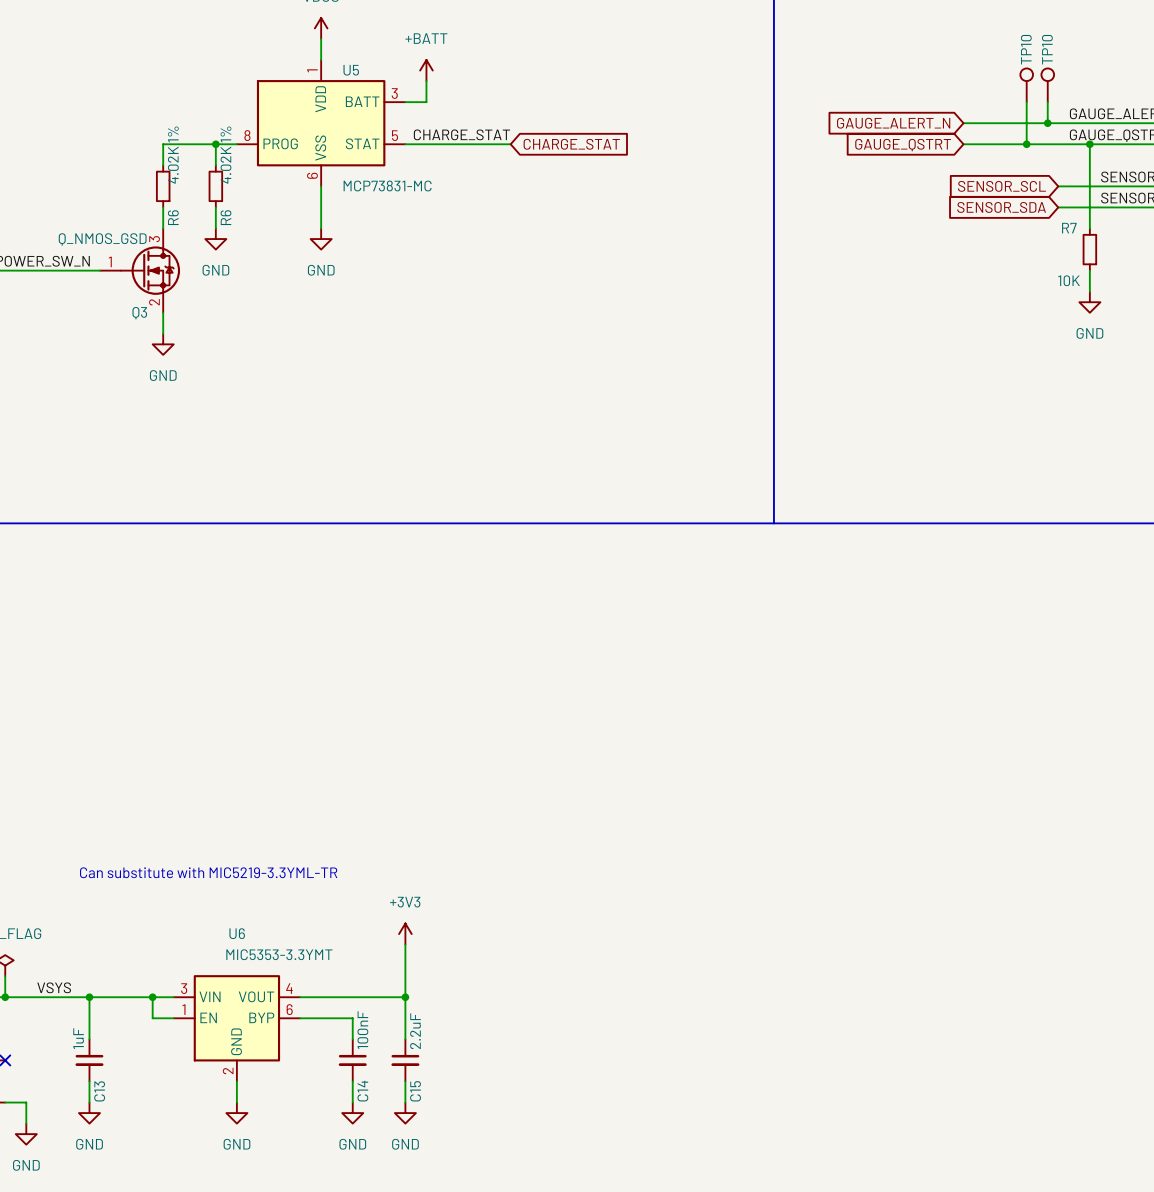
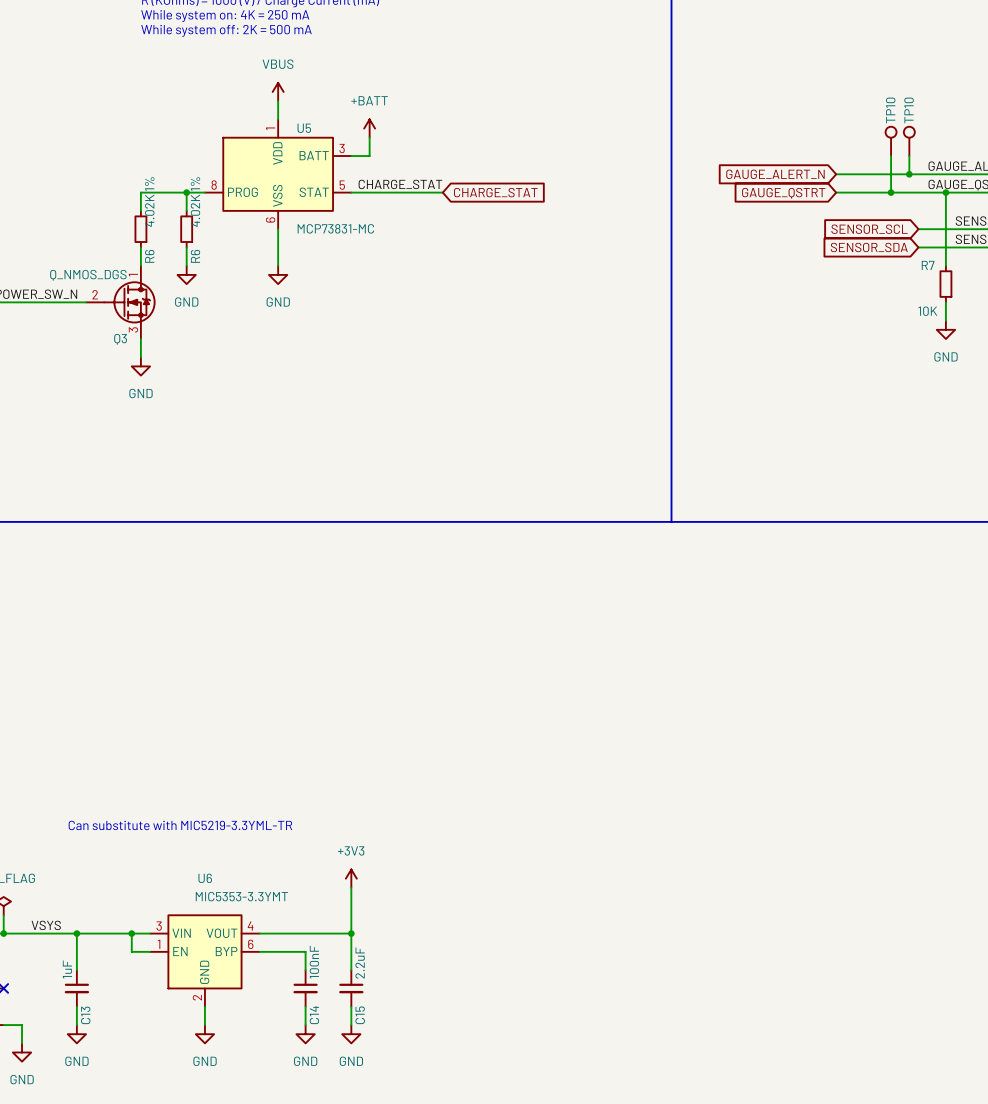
Q3 value: Q_NMOS_GSD (102, 239) -> Q_NMOS_DGS (88, 275)
Q3 pin number: 3 (154, 239) -> 1 (133, 275)
Q3 pin number: 1 (110, 261) -> 2 (95, 294)
Q3 pin number: 2 (154, 302) -> 3 (133, 329)

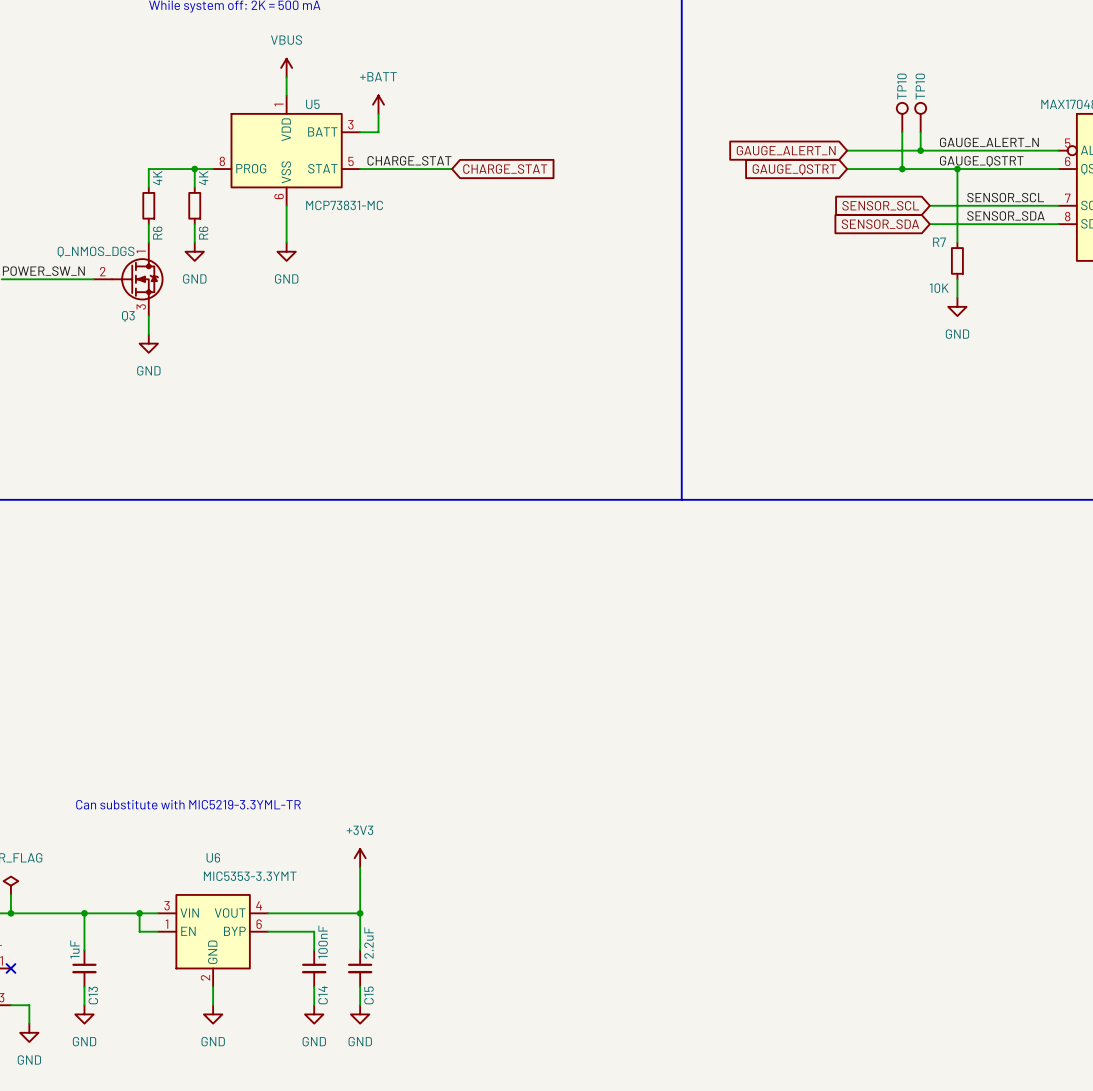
R6 value: 4.02K 1% (149, 202) -> 4K (157, 178)
R6 value: 4.02K 1% (195, 202) -> 4K (203, 178)
label: VSYS (46, 925) -> none

